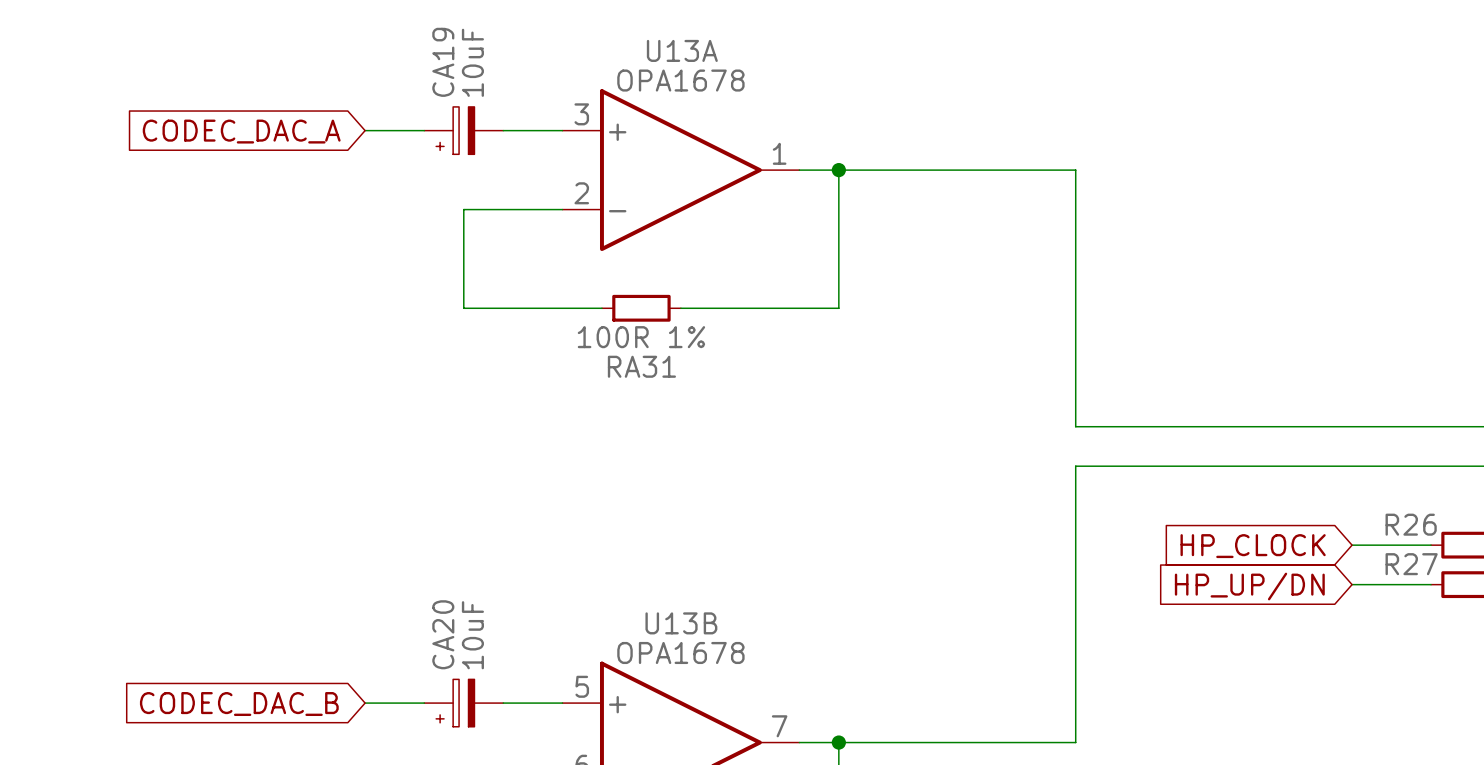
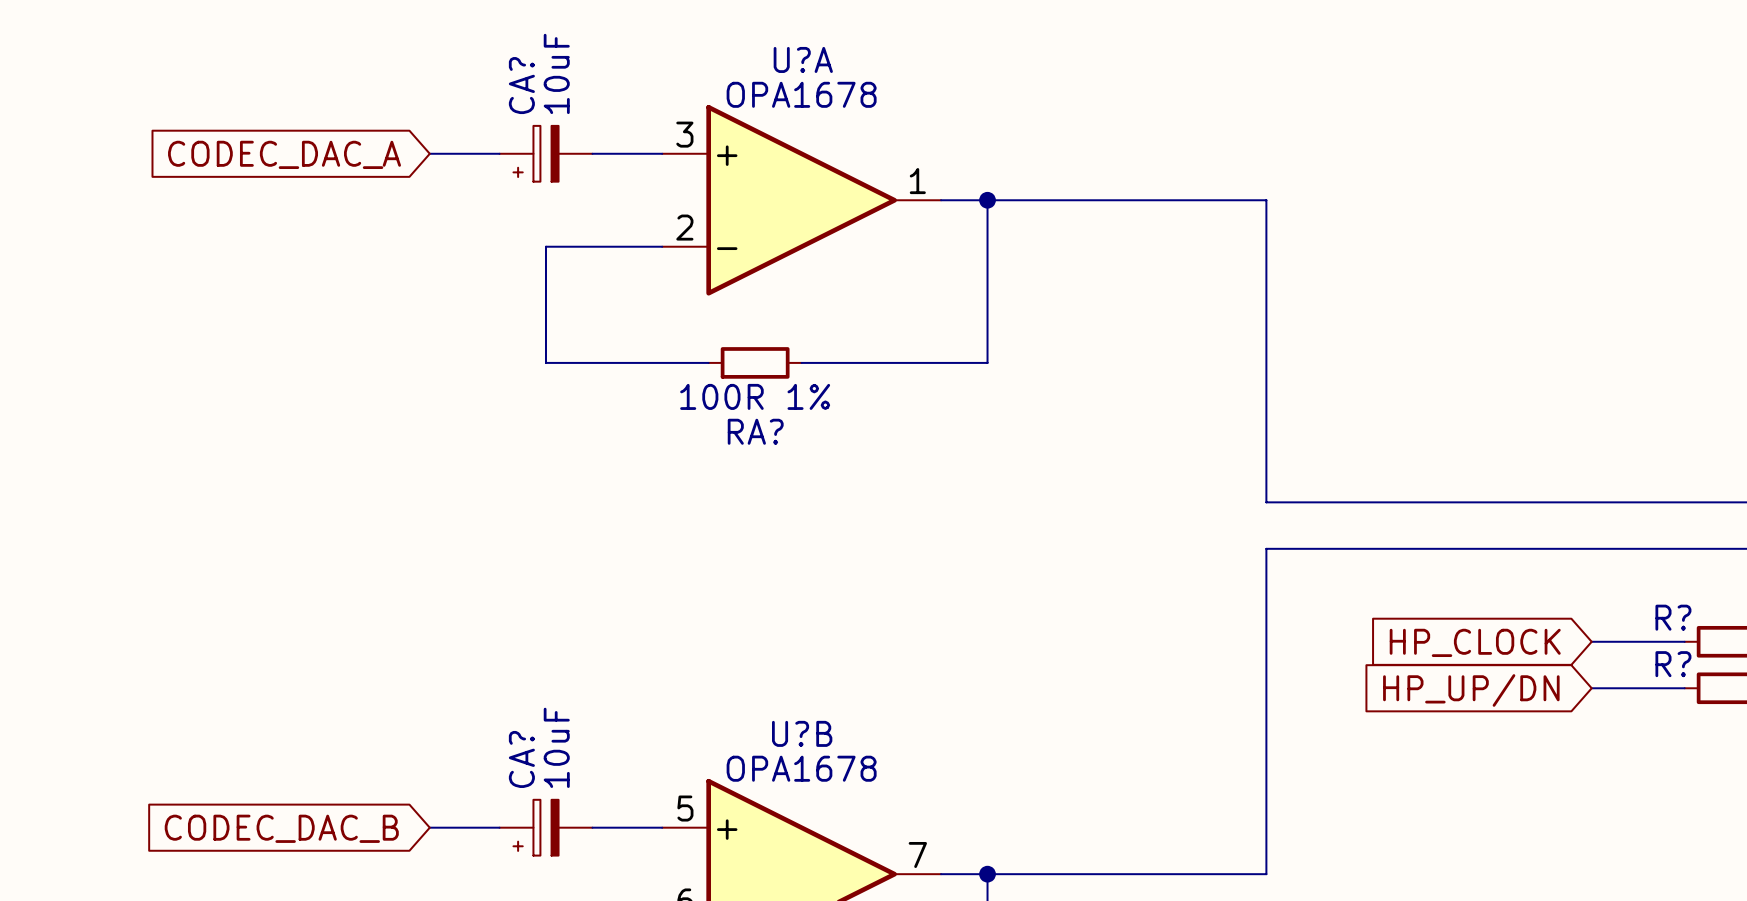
U13A name: U13A (682, 50) -> U?A (803, 59)
CA19 name: CA19 (443, 62) -> CA? (521, 85)
RA31 name: RA31 (641, 366) -> RA? (755, 431)
R26 name: R26 (1411, 524) -> R? (1673, 617)
R27 name: R27 (1411, 564) -> R? (1673, 664)
U13B name: U13B (681, 623) -> U?B (802, 733)
CA20 name: CA20 (443, 634) -> CA? (521, 759)

